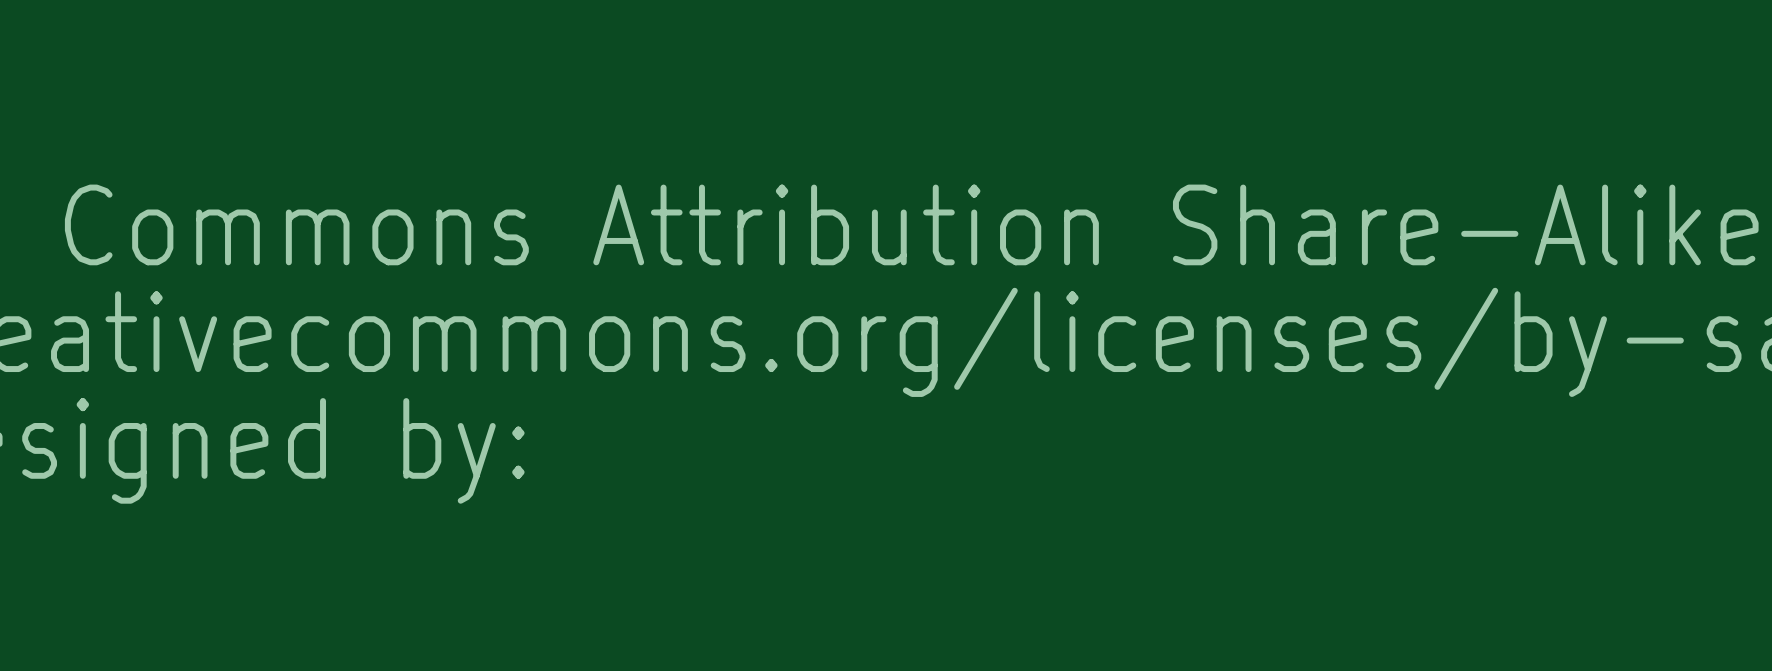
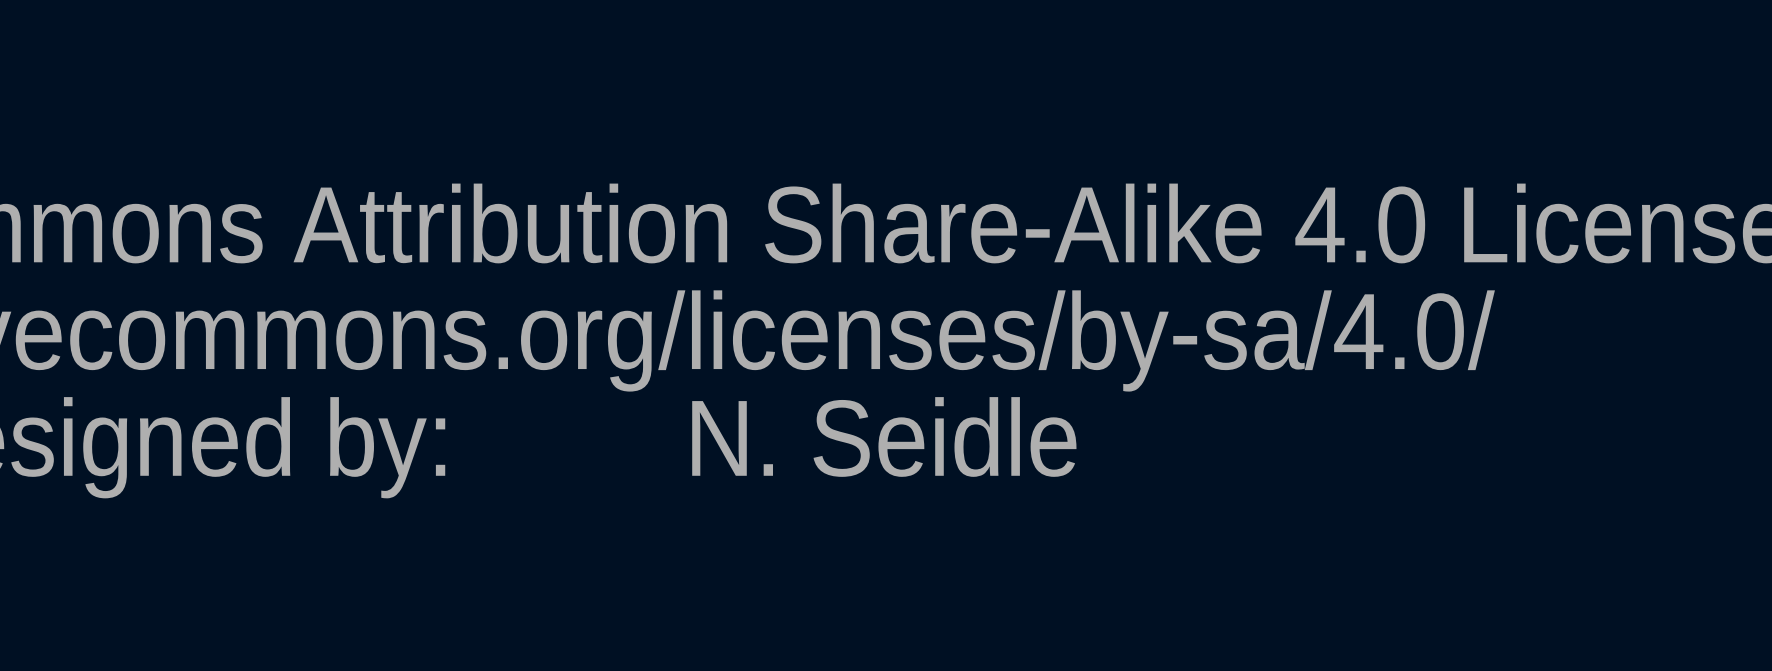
text: none -> N. Seidle (884, 436)

